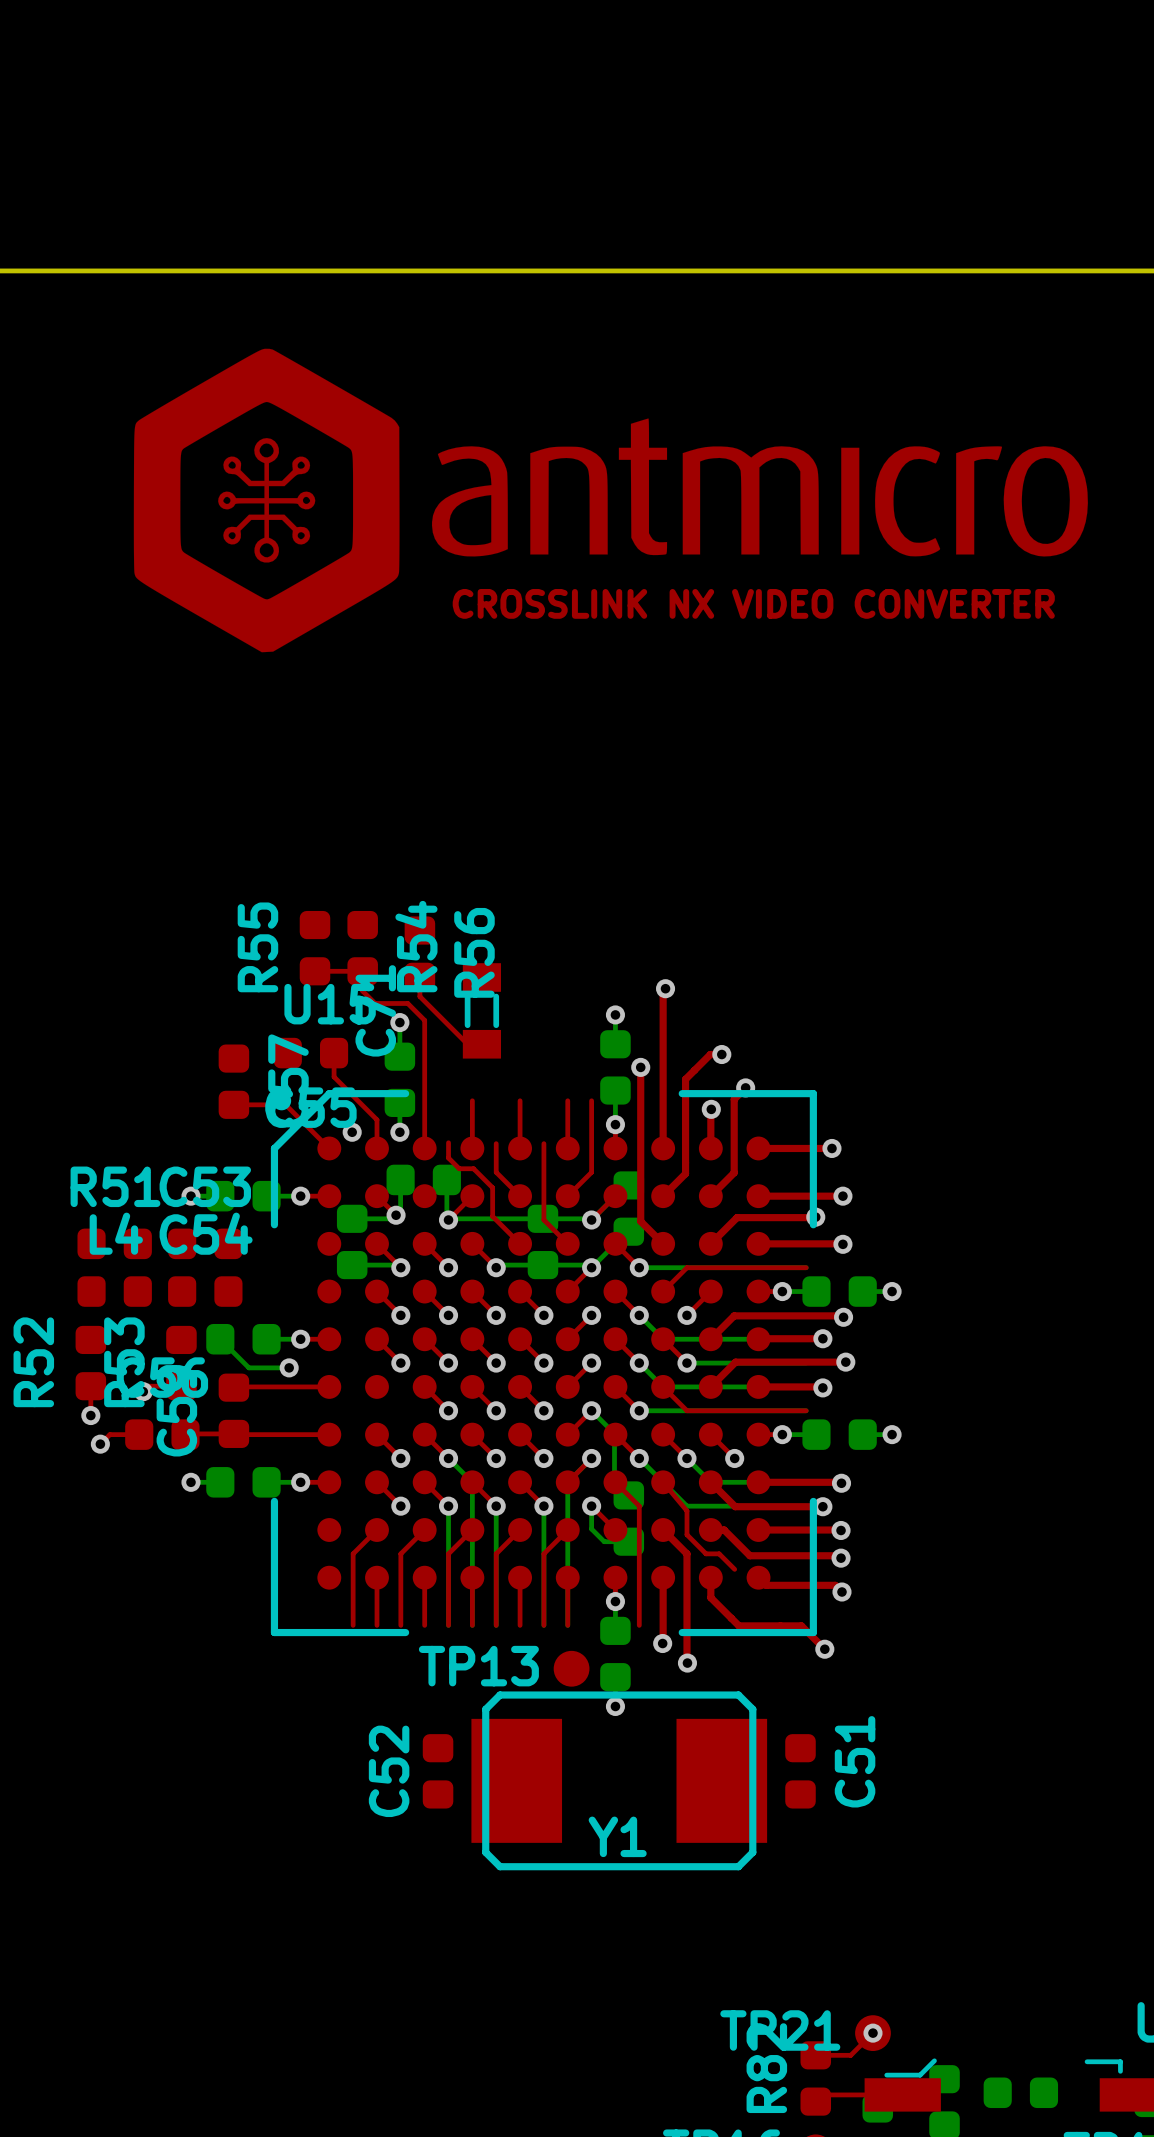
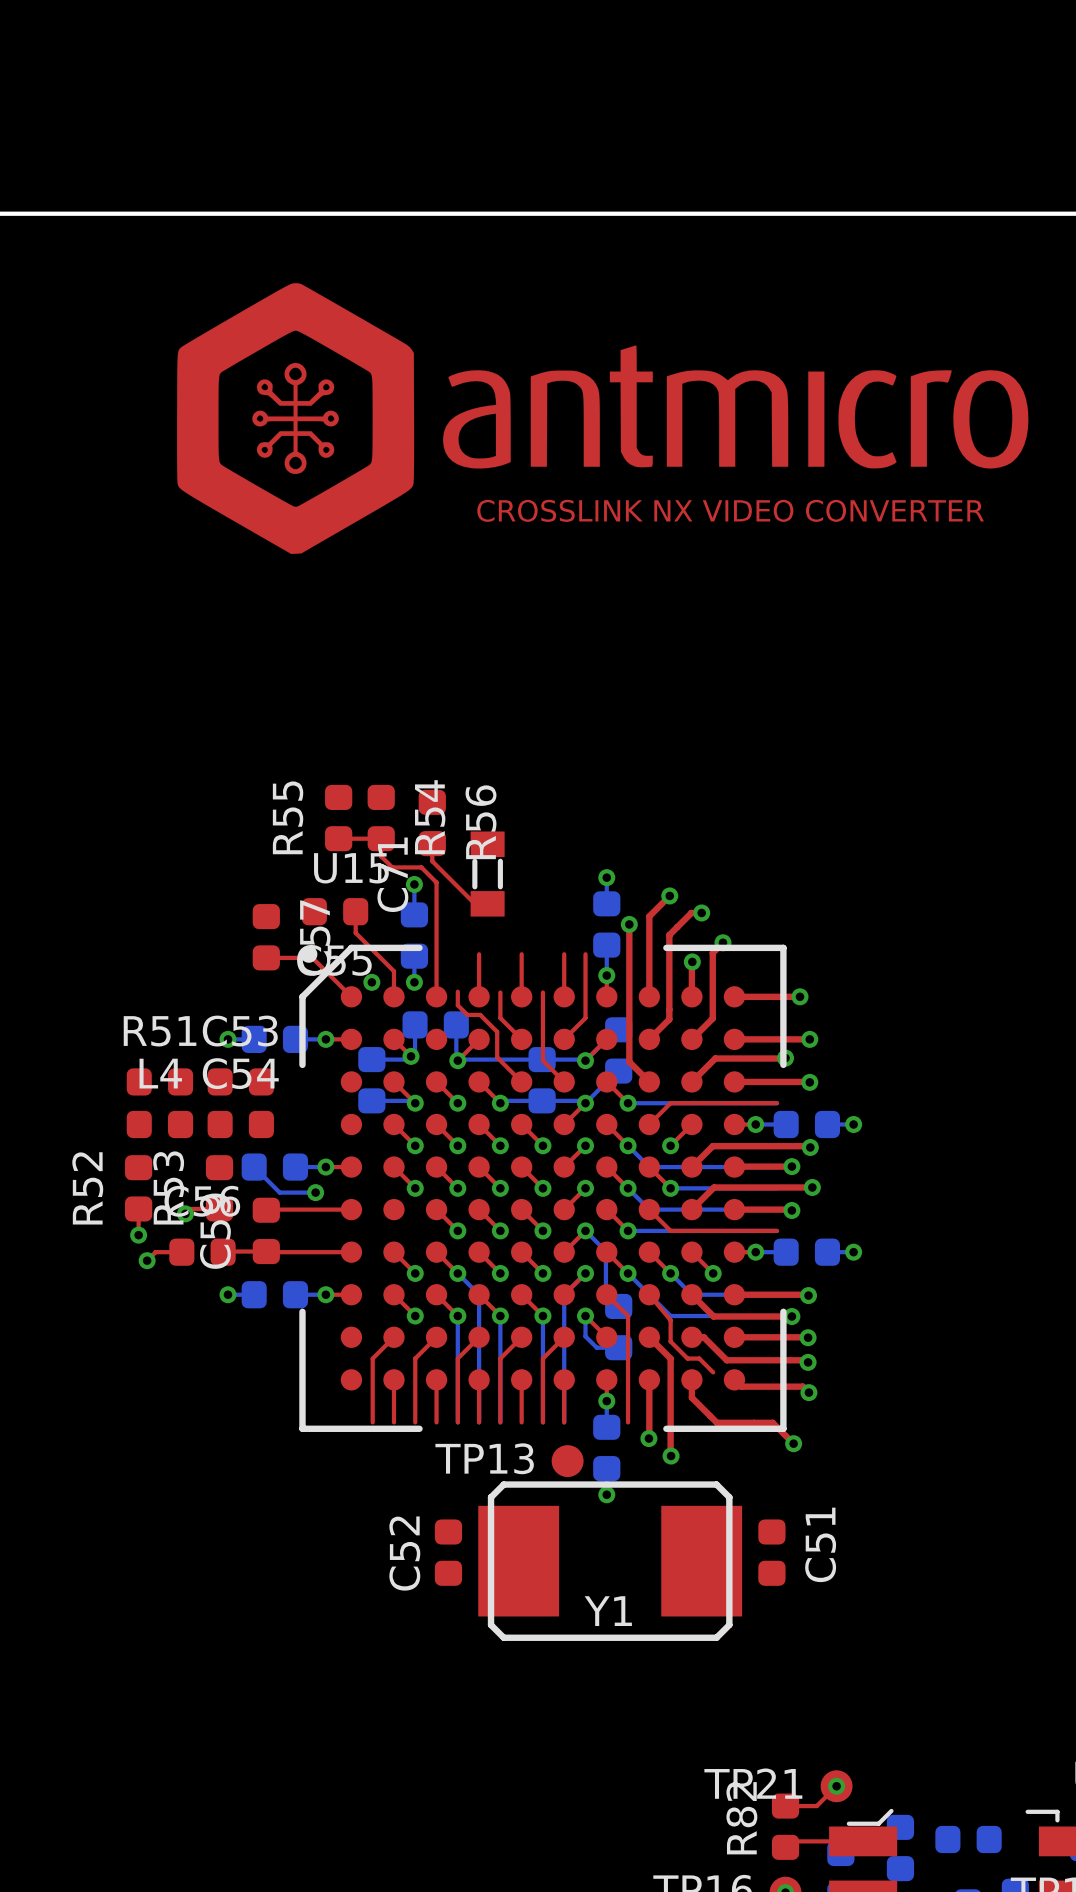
top track: (665, 988) (663, 991) (663, 1058) -> (669, 895) (649, 916)
via position: (665, 988) -> (669, 895)

